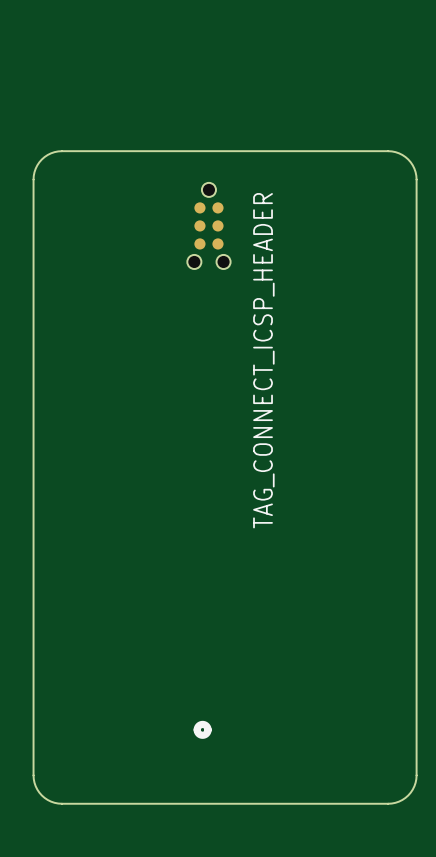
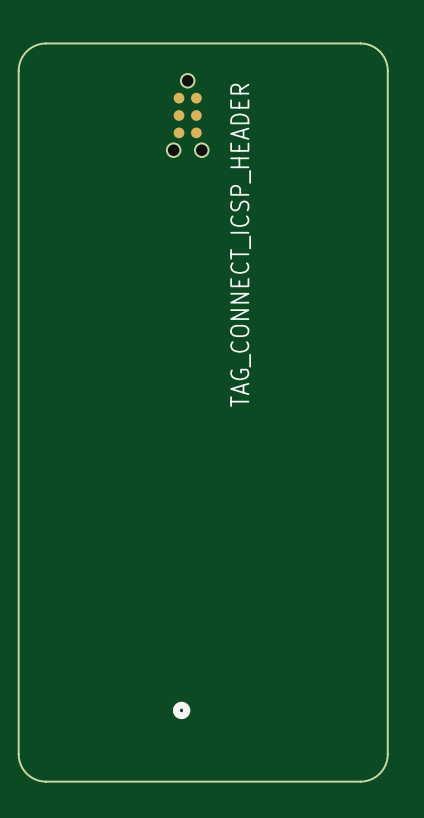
board edge: (416, 179) (414, 168) (408, 159) (399, 153) (388, 151) (58, 151) (47, 154) (39, 162) (33, 179) -> (387, 180) (386, 63) (377, 49) (360, 43) (46, 43) (35, 45) (24, 54) (18, 67) (18, 180)
TAG_CONNECT_ICSP_HEADER position: (208, 225) -> (187, 115)

